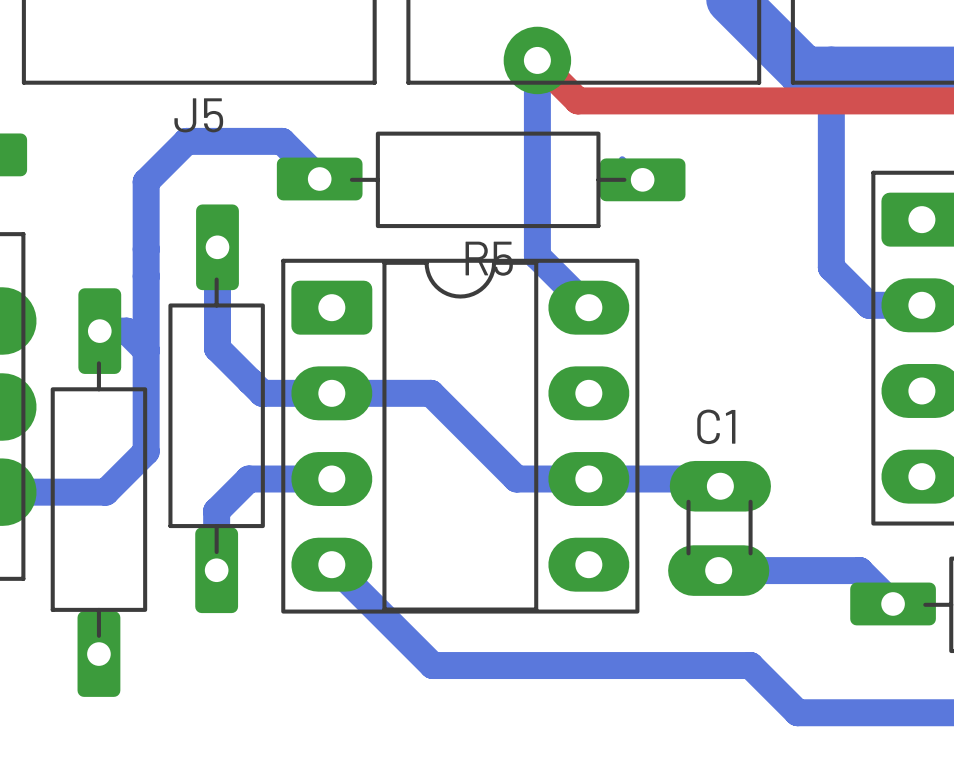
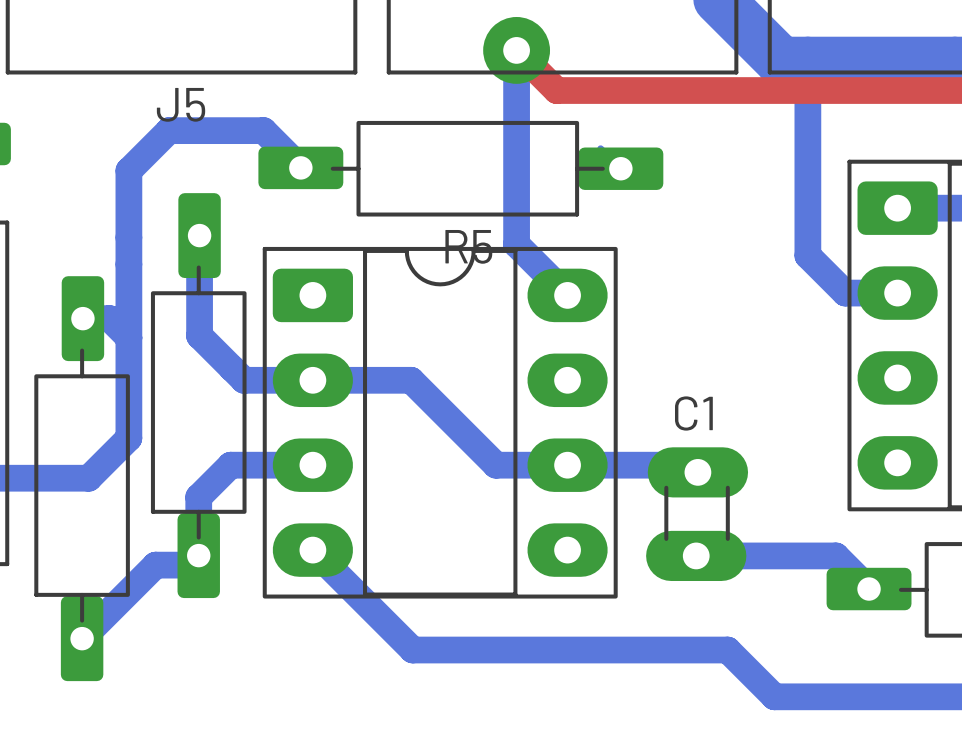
bottom track: none -> (198, 555) (189, 565) (155, 565) (82, 638)

